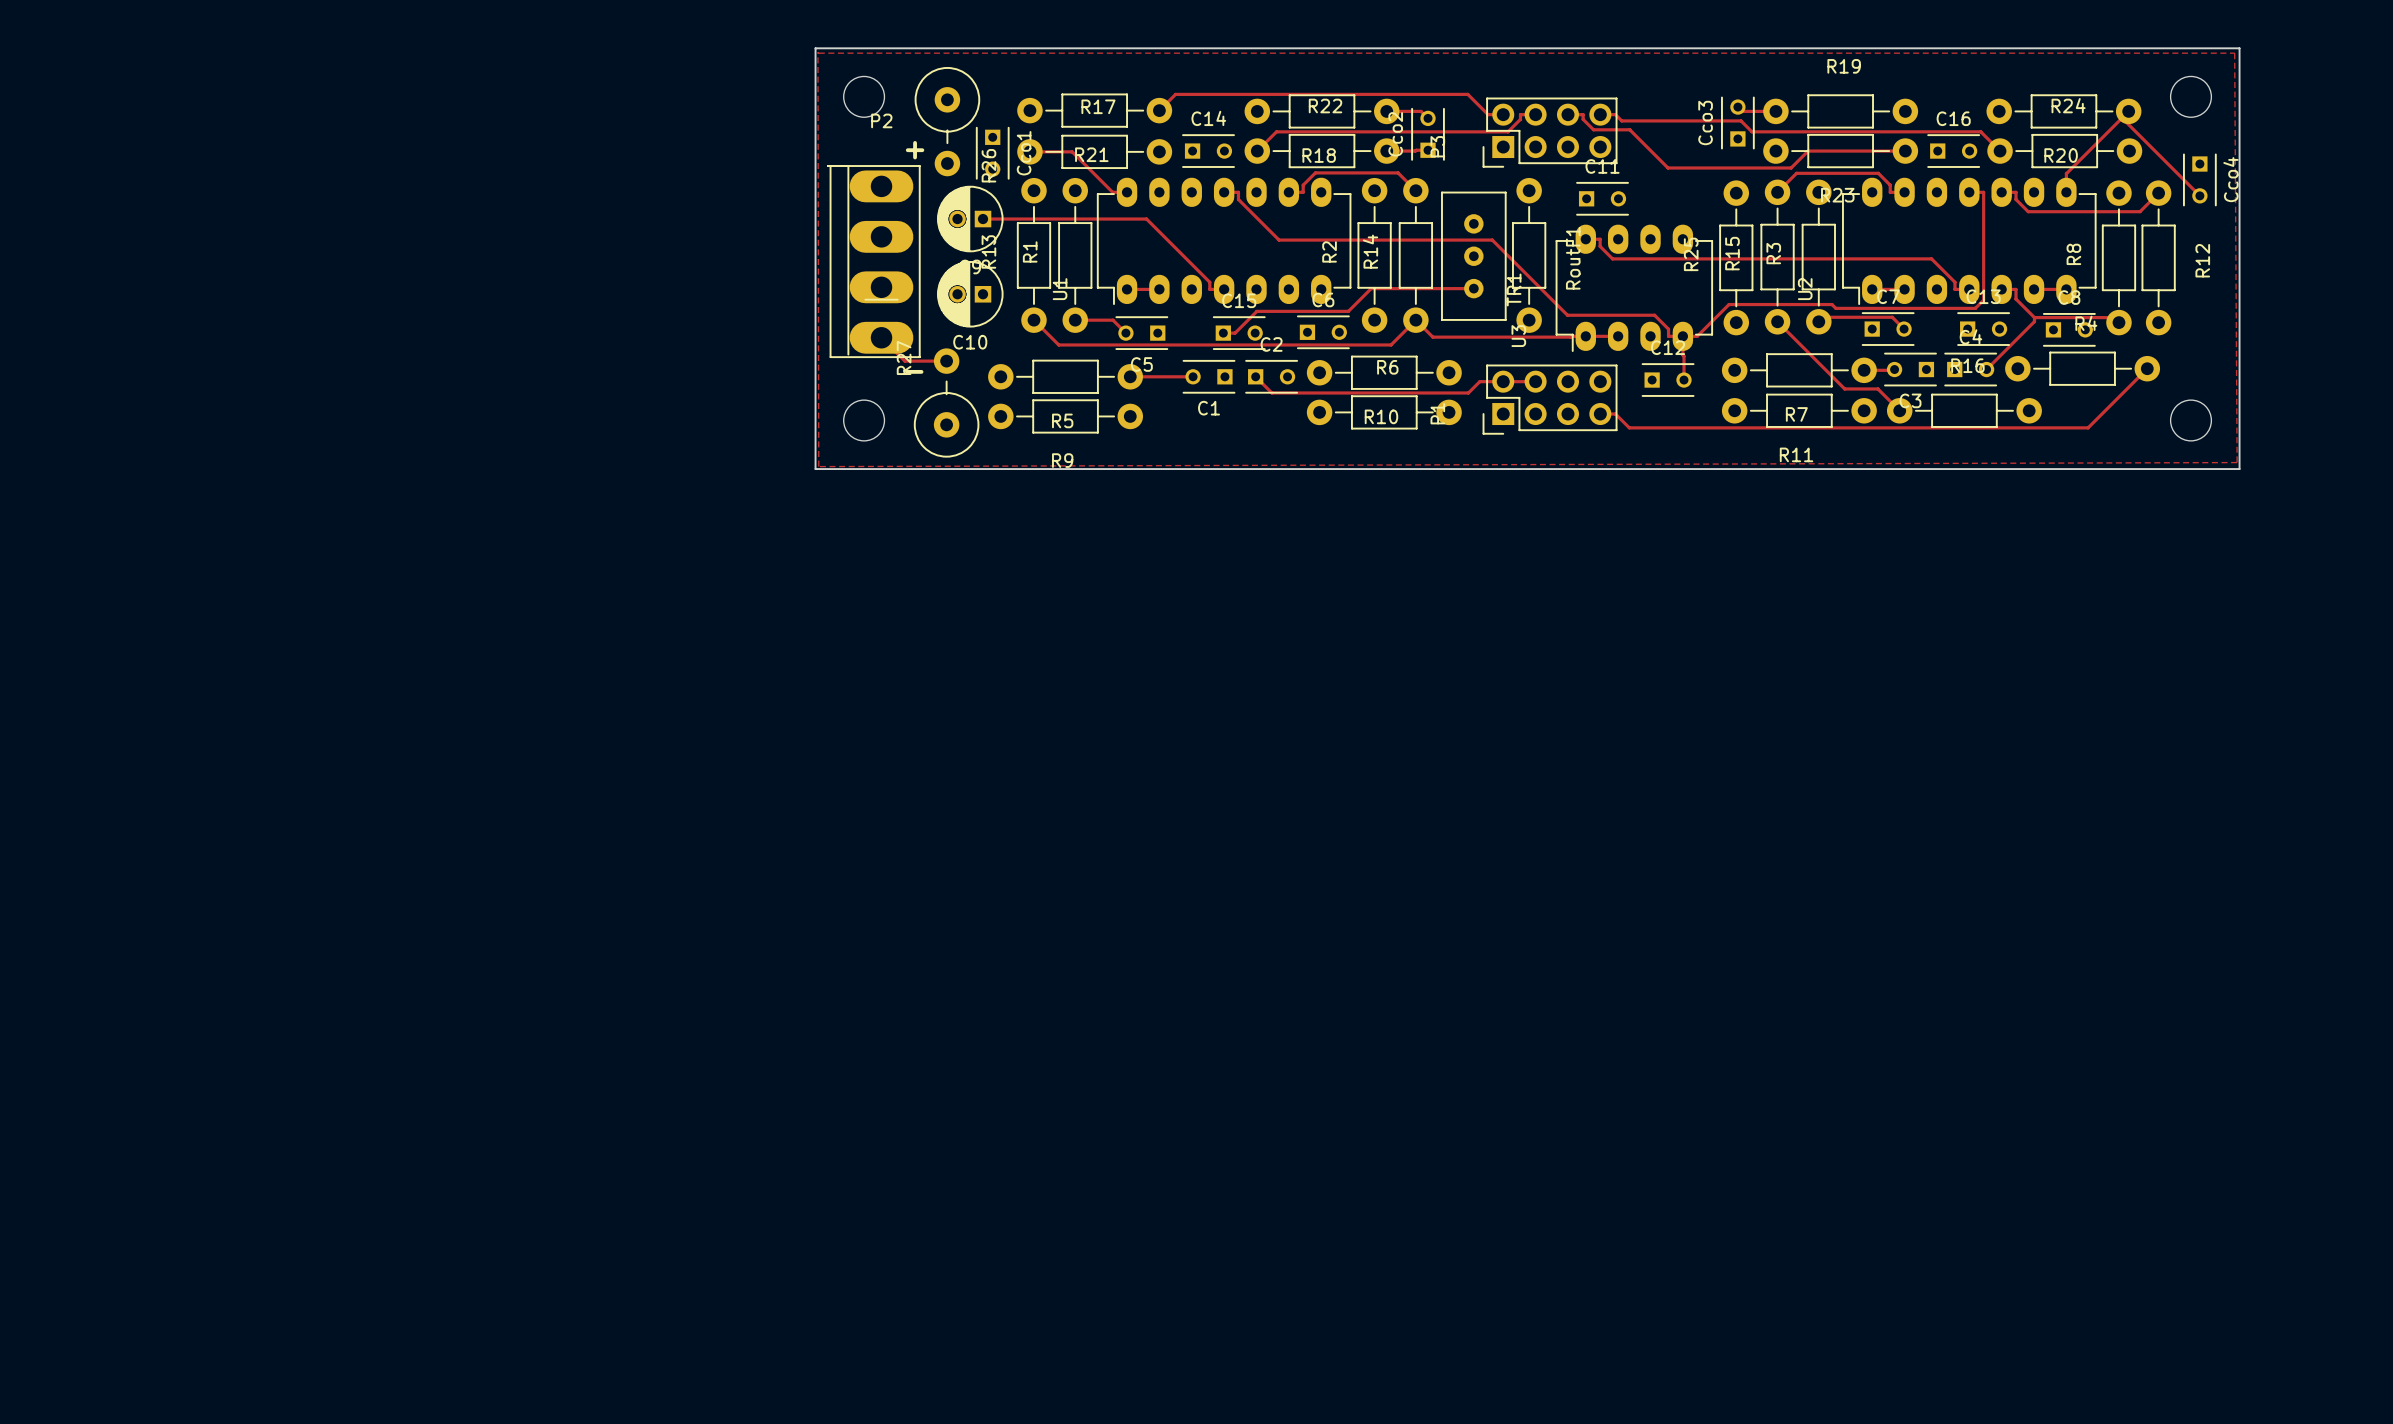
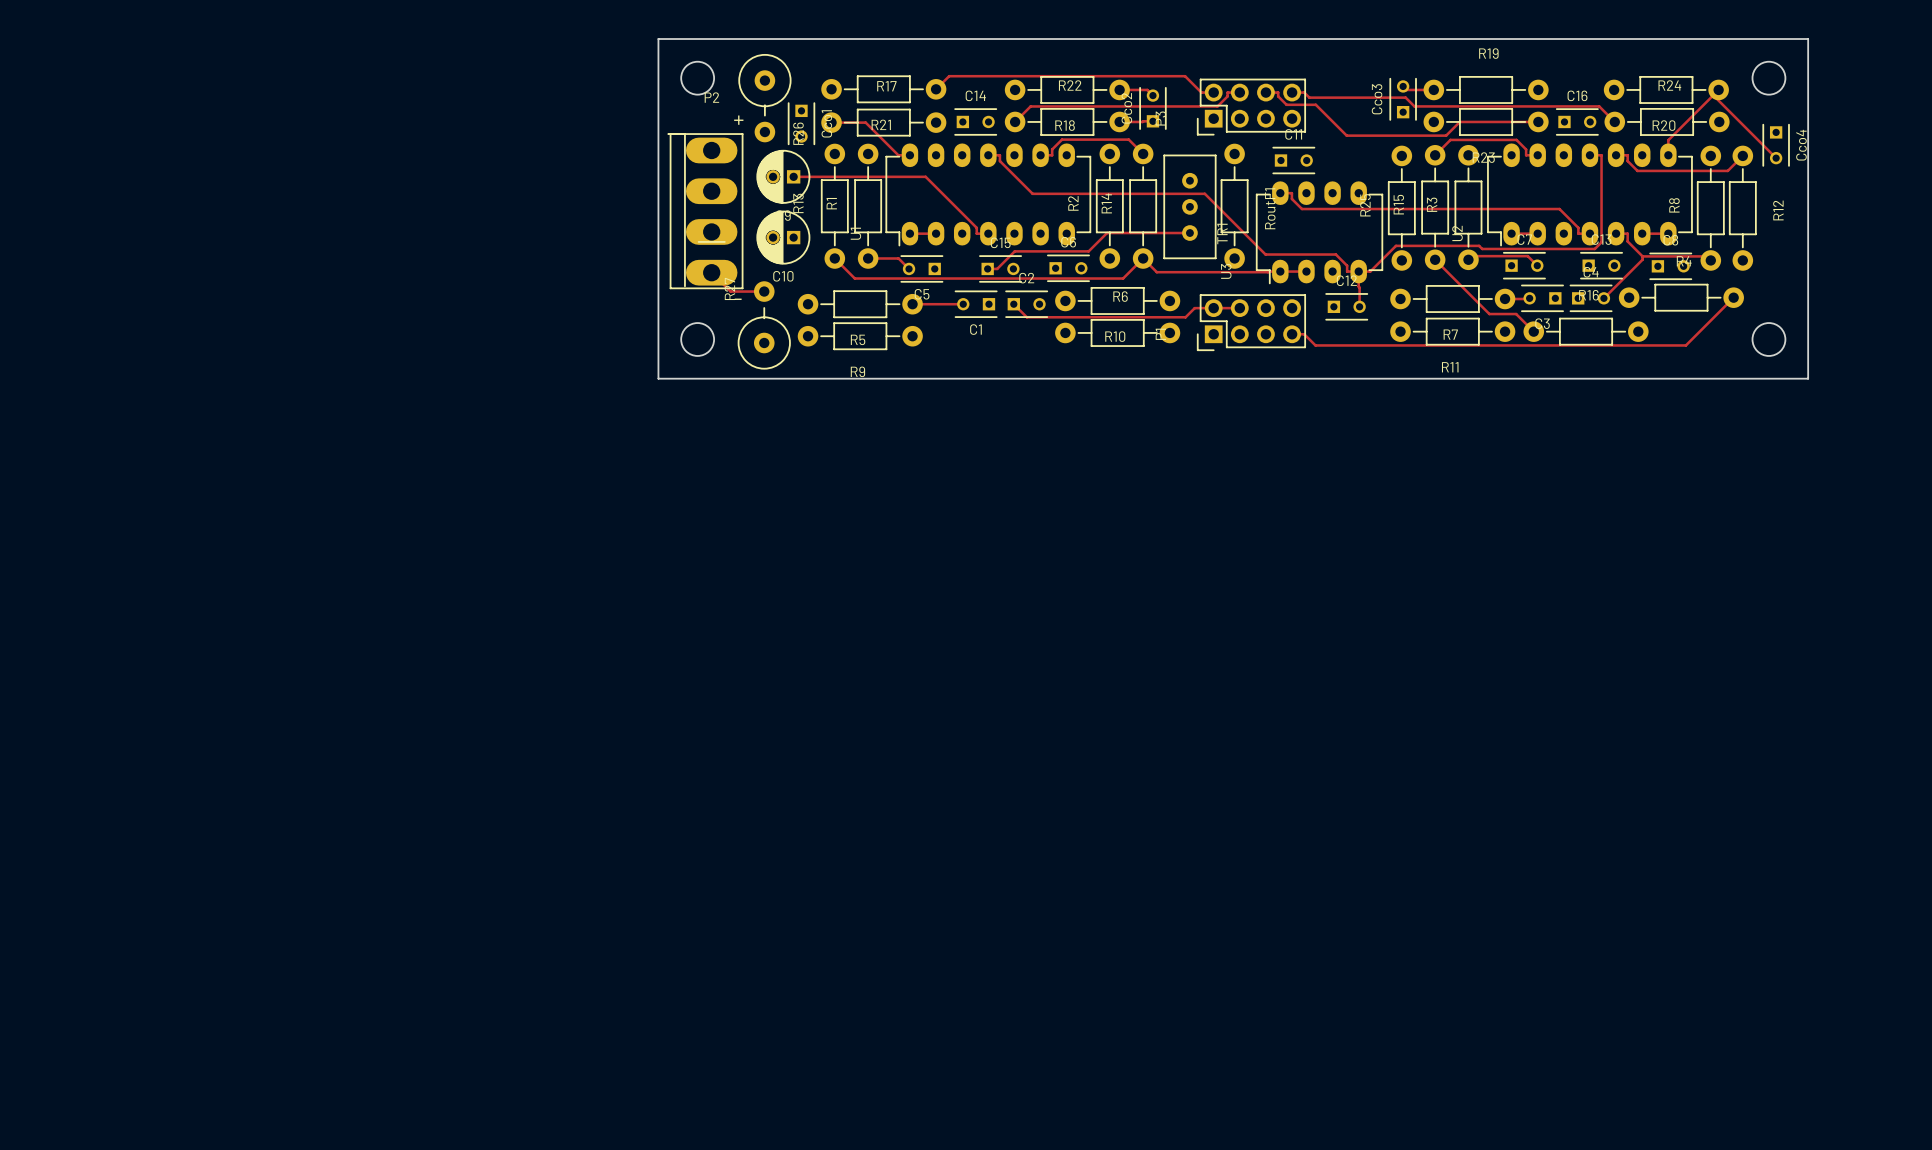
zone outline: (817, 52) (818, 466) (2237, 462) (2234, 53) (817, 52) -> none

